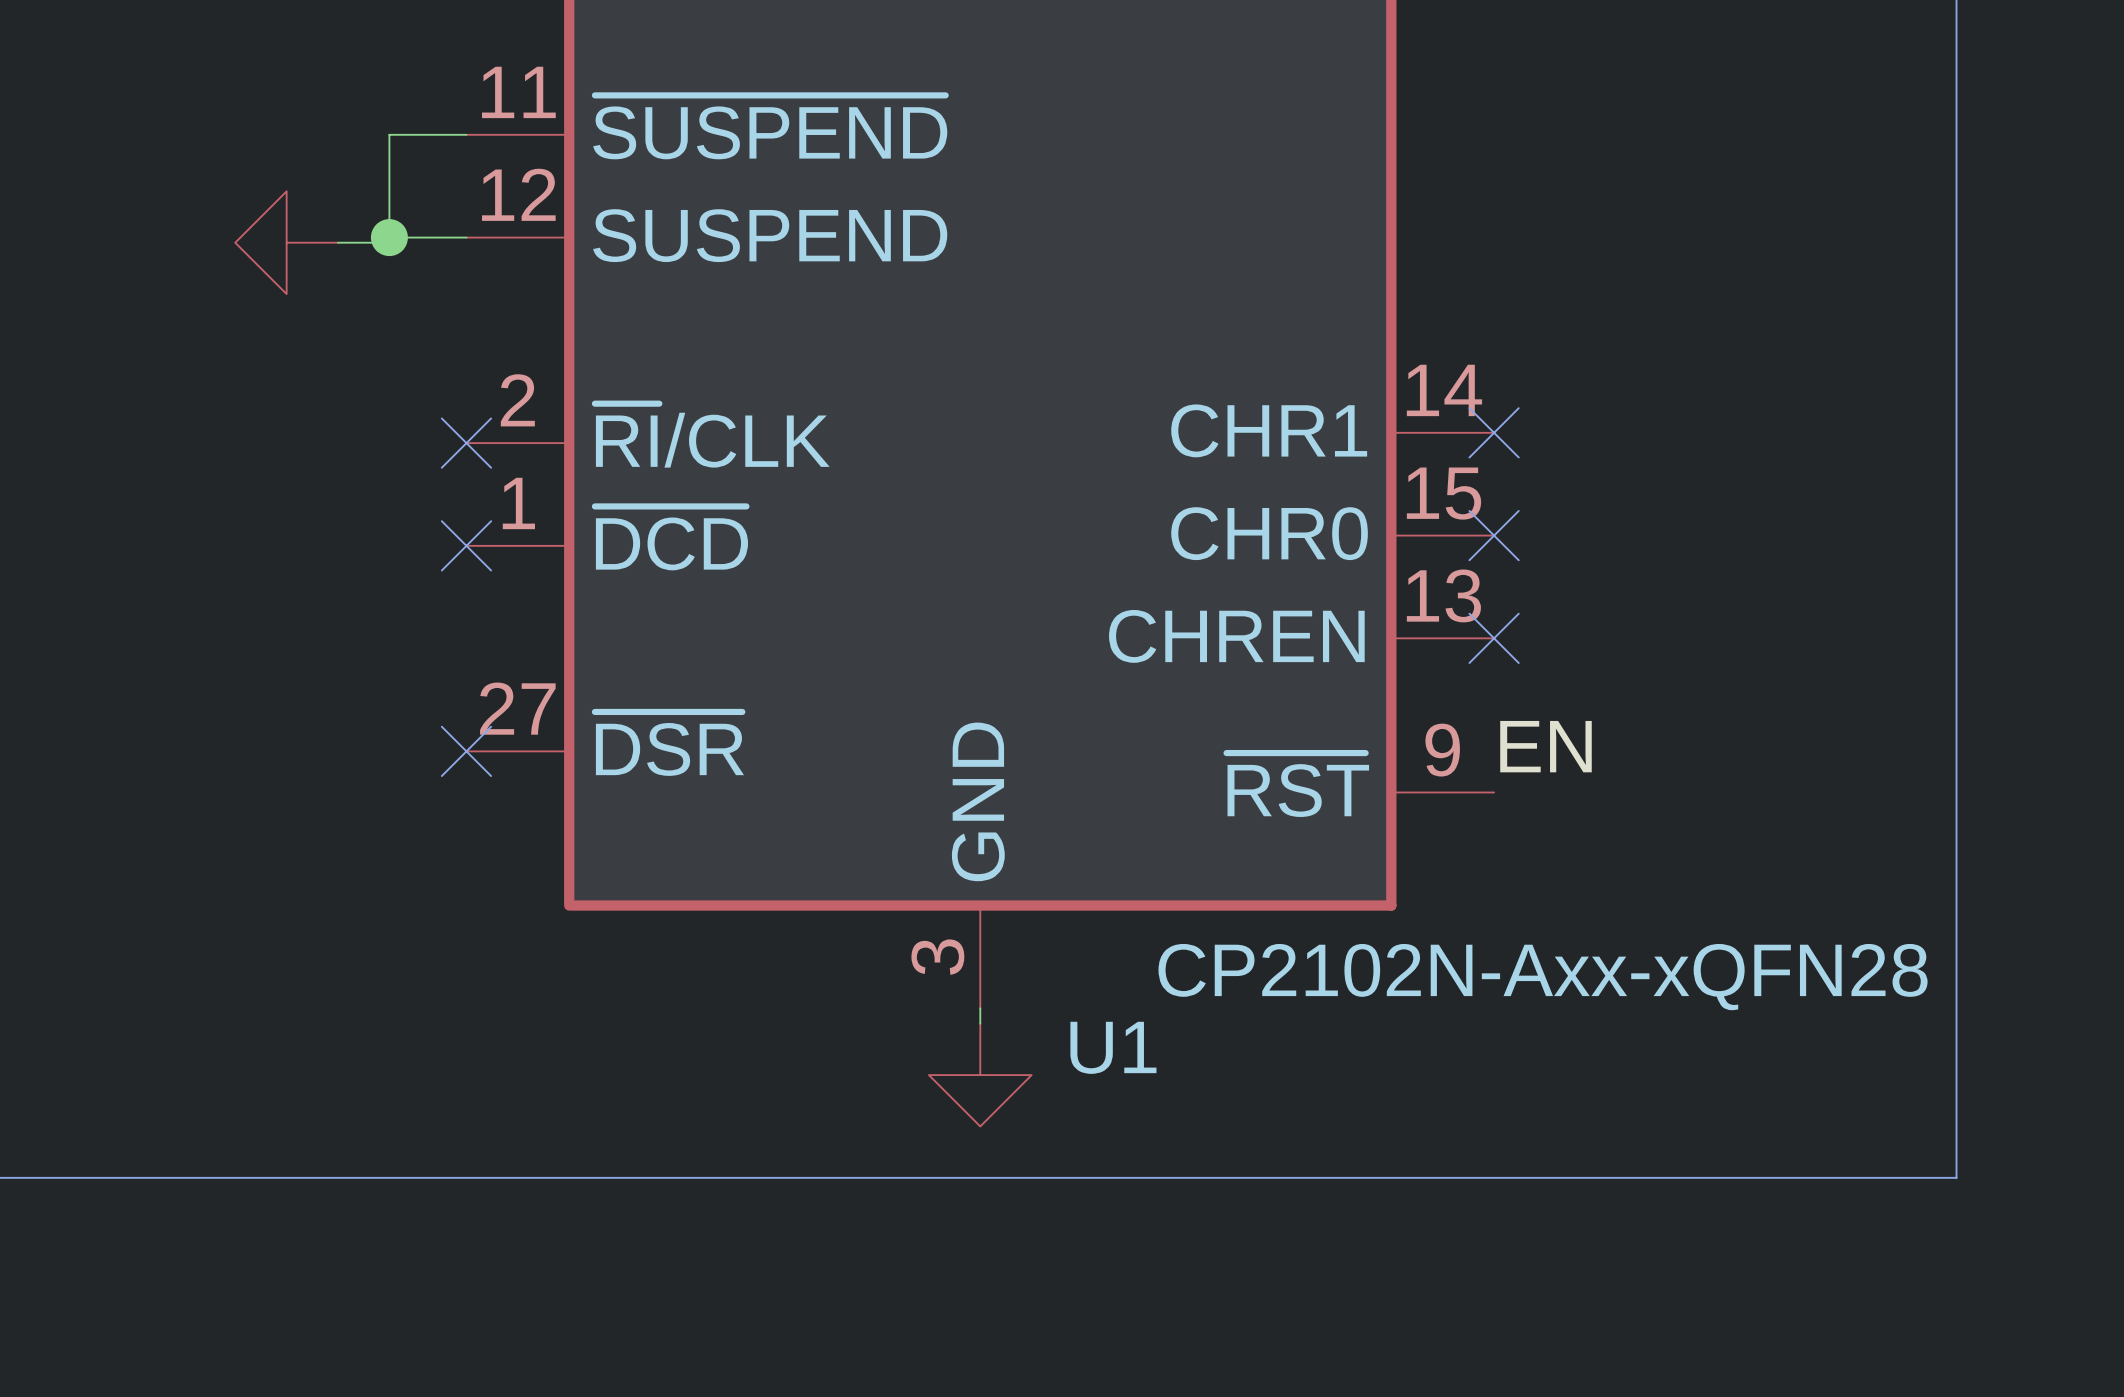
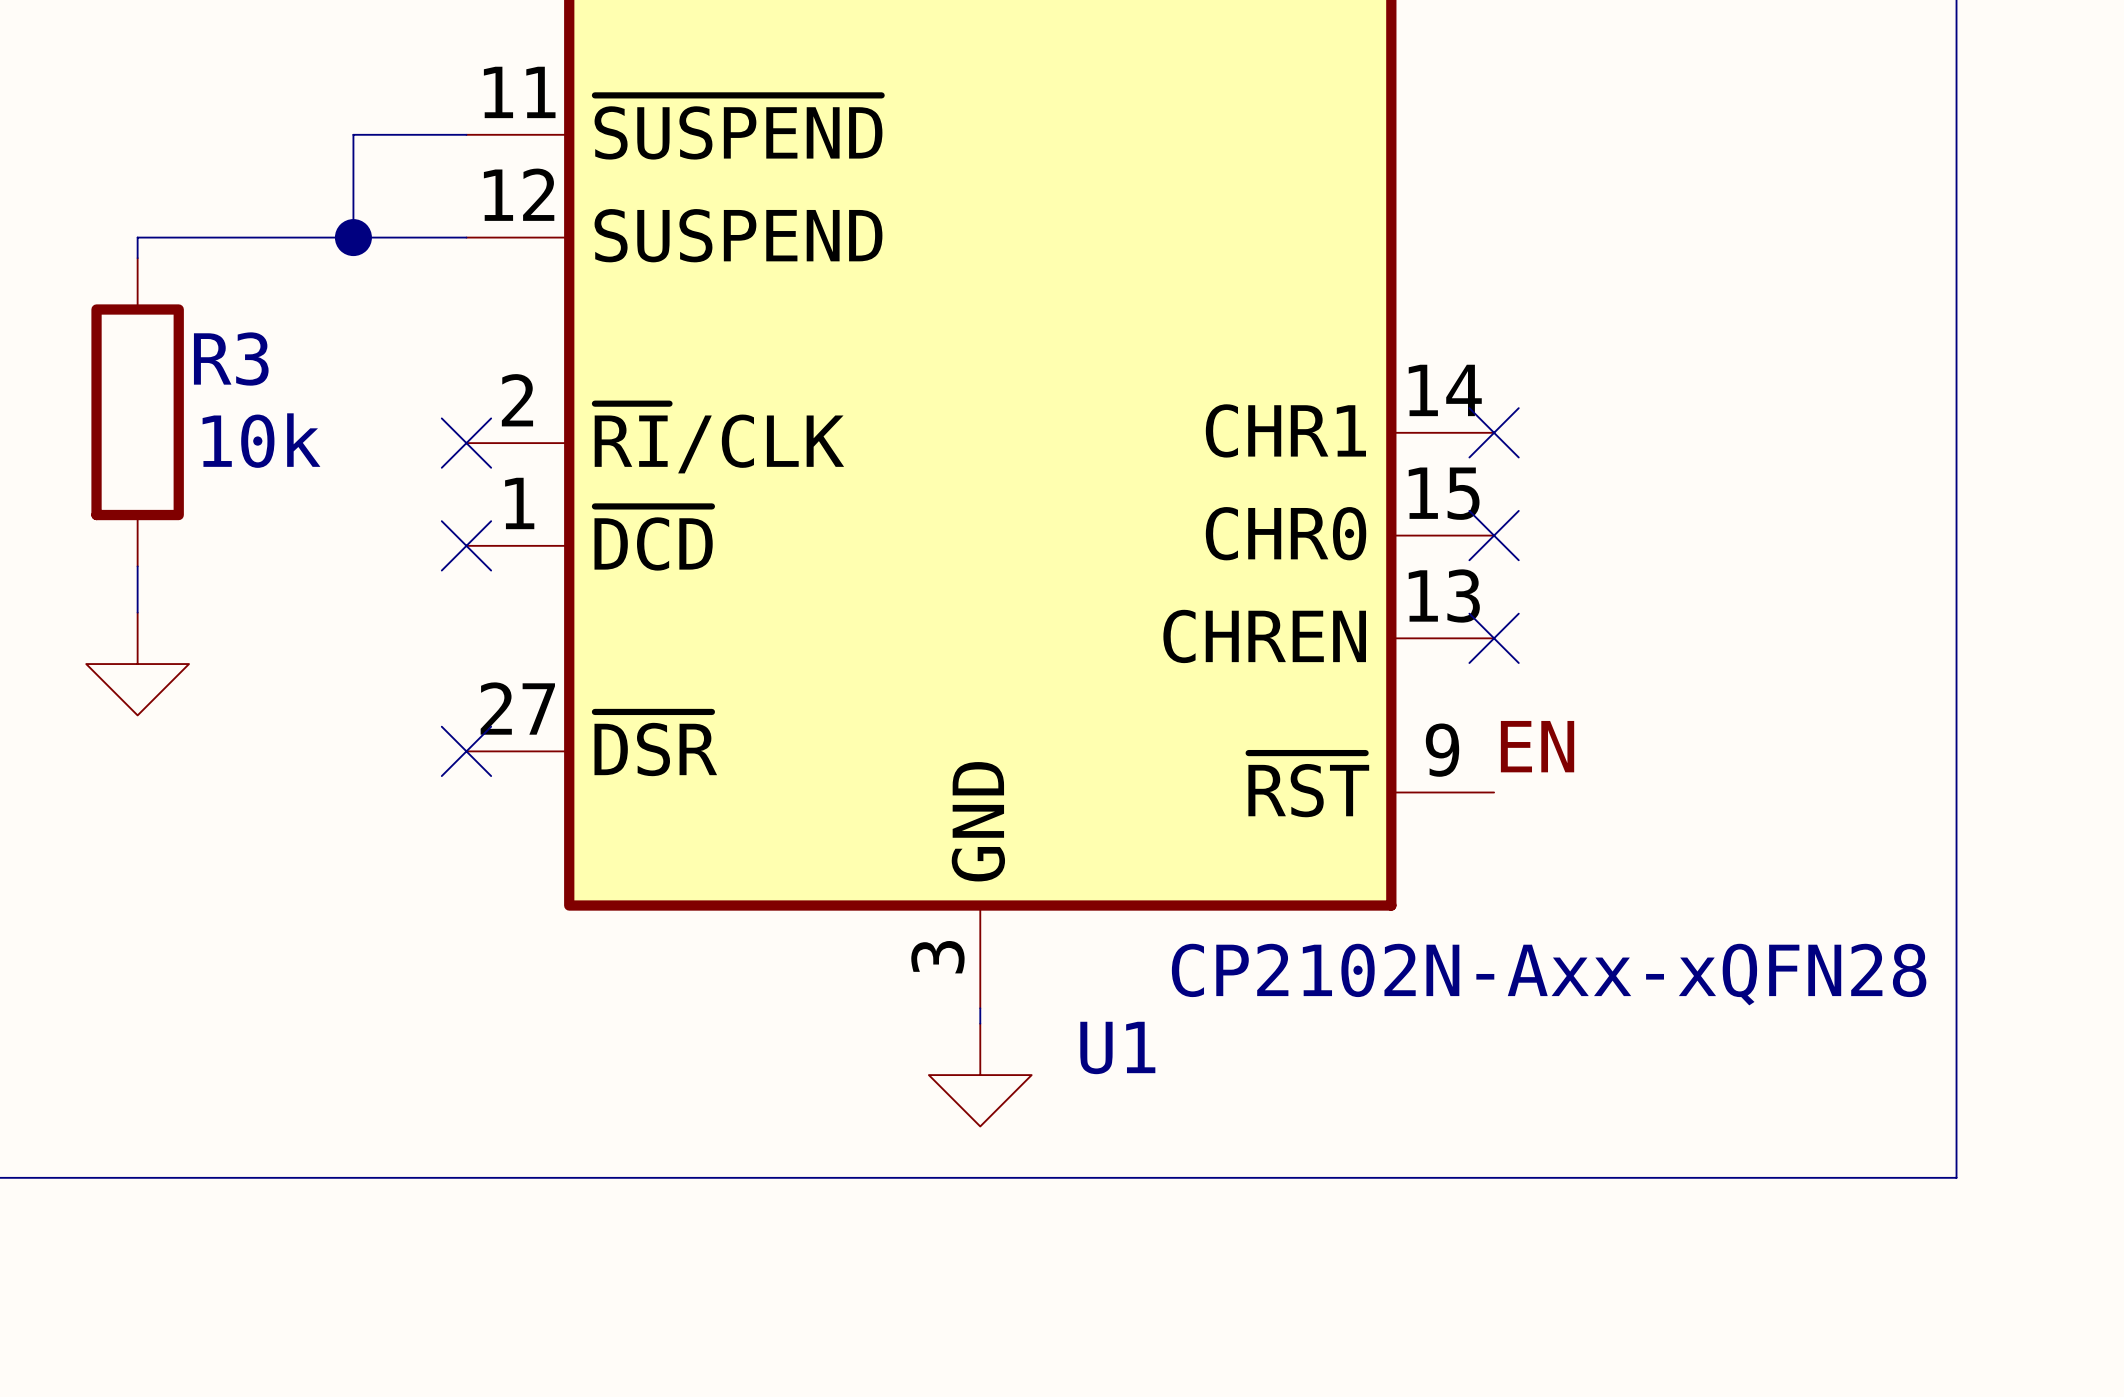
wire: (389, 134) (389, 242) (338, 242) -> (389, 134) (353, 134) (353, 237)
wire: none -> (389, 237) (137, 237) (137, 258)
junction position: (389, 237) -> (353, 237)
power symbol rotation: 0° (286, 242) -> 90° counterclockwise (137, 664)
power symbol position: (286, 242) -> (137, 664)
R3: none -> 10k (137, 412)
wire: none -> (137, 566) (137, 612)

